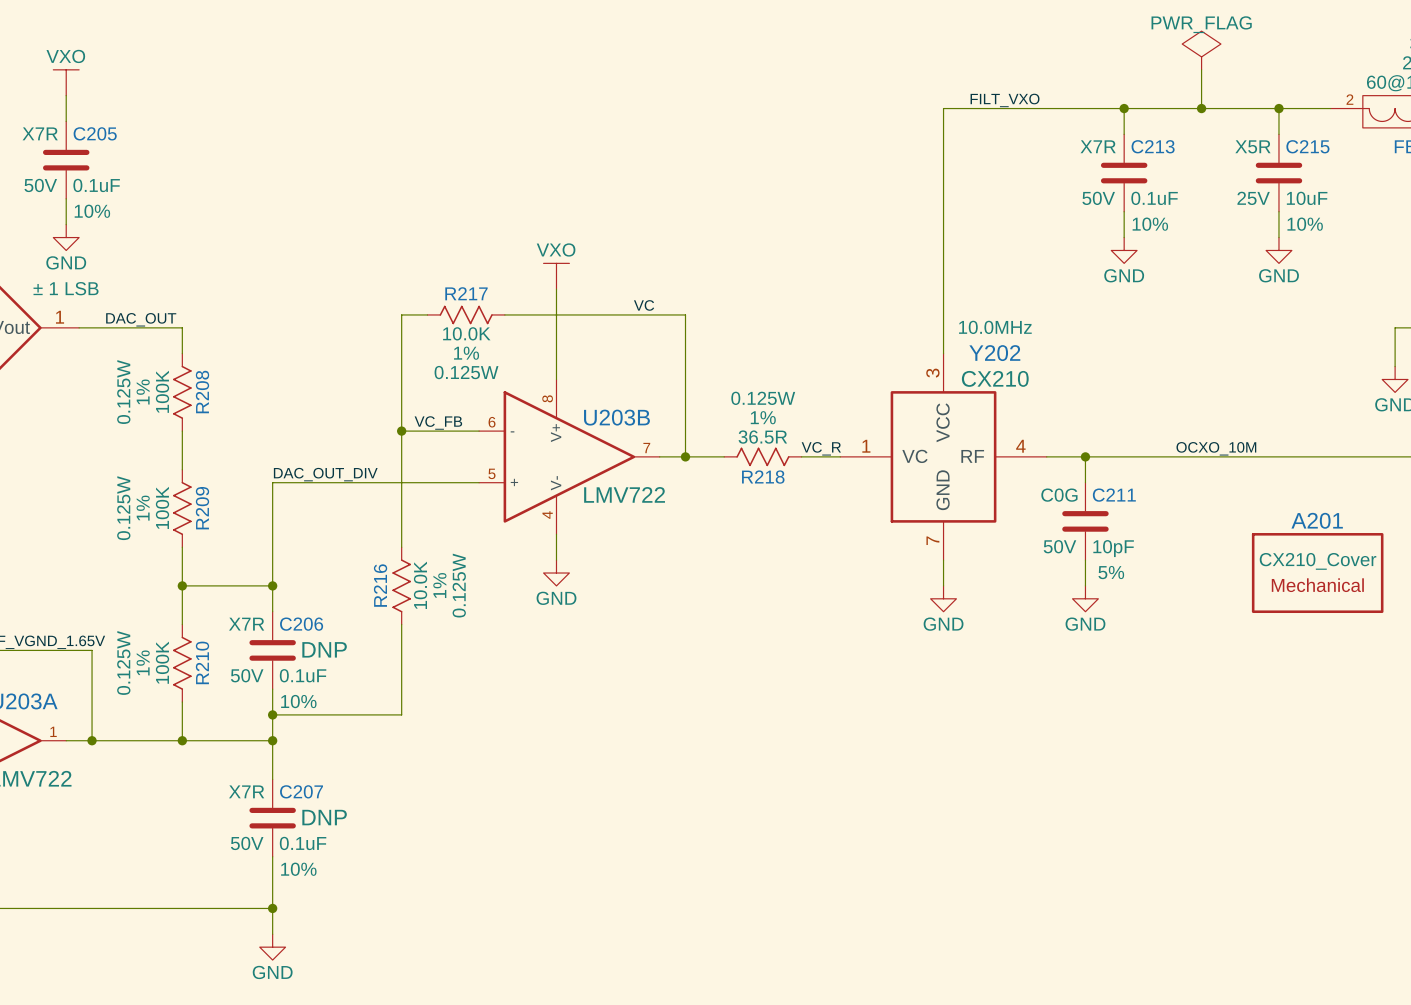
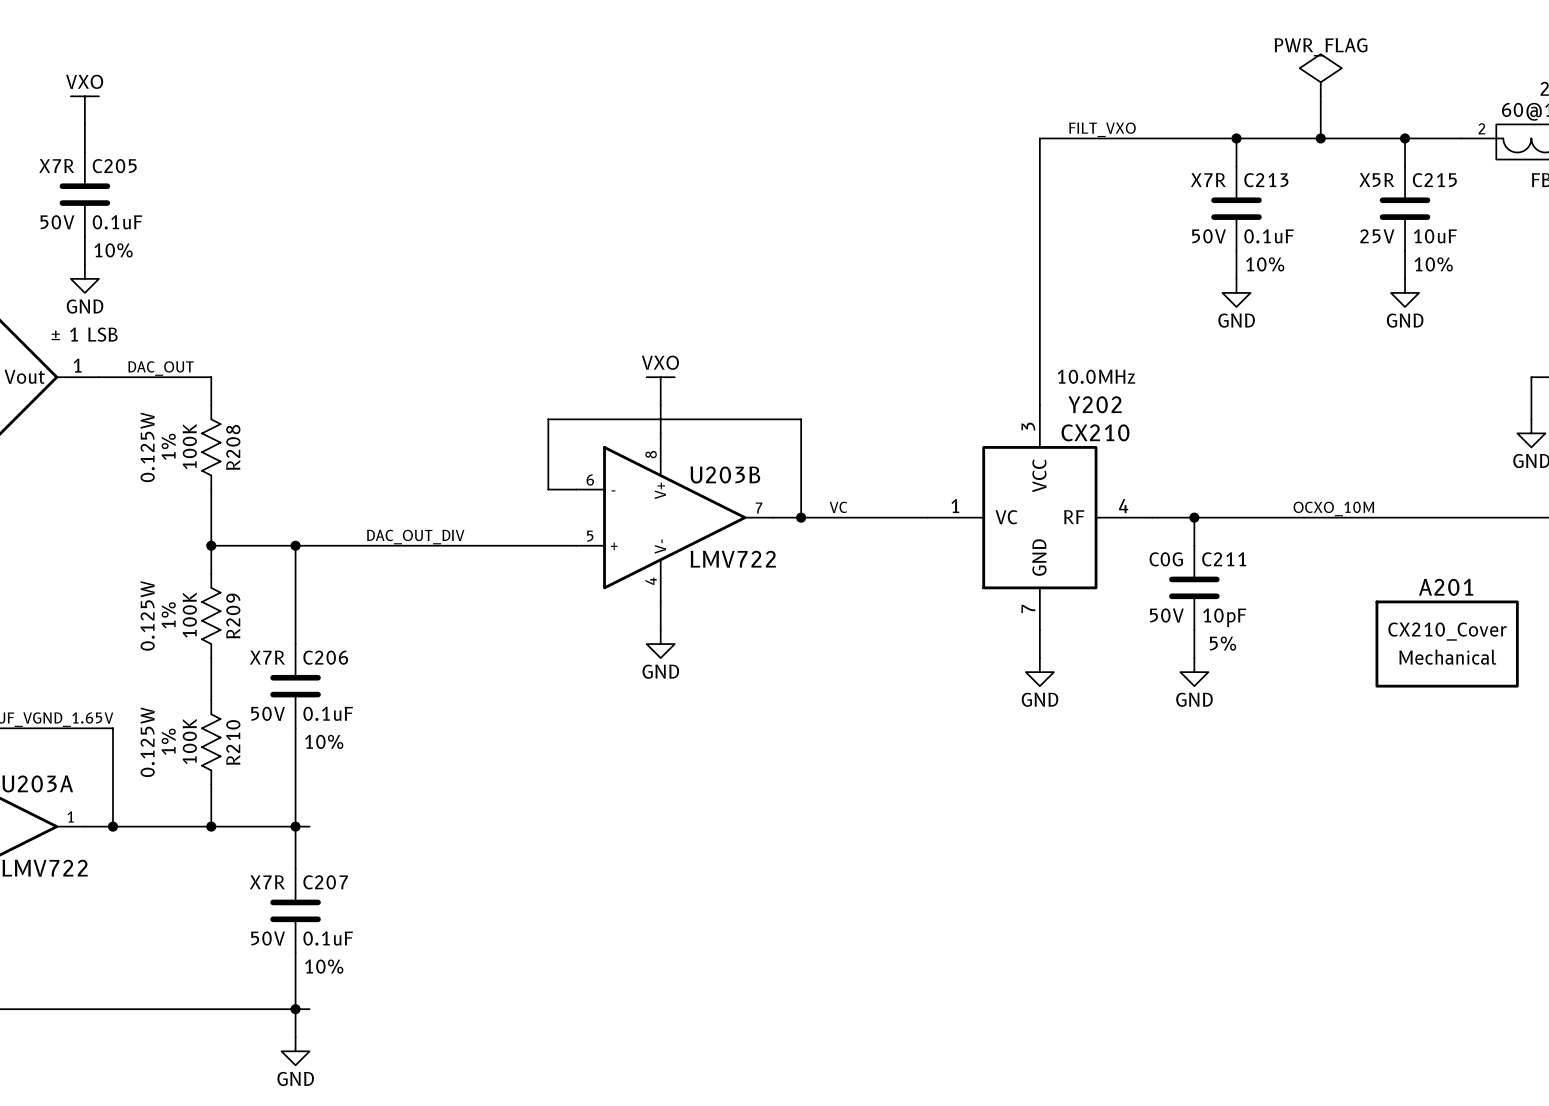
power symbol position: VXO (556, 276) -> VXO (660, 391)
wire: (556, 289) (556, 379) -> none
label position: VC (644, 305) -> VC (838, 507)
wire: (427, 314) (401, 314) (401, 547) -> none
R217: 10.0K (466, 314) -> none
wire: (504, 314) (685, 314) (685, 456) -> none
wire: none -> (660, 405) (660, 433)
label: VC_FB (438, 422) -> none
wire: (401, 431) (479, 431) -> none
junction: (401, 431) -> none
wire: none -> (576, 489) (548, 489) (548, 419) (801, 419) (801, 517) (885, 517)
label: VC_R (821, 448) -> none
U203B position: (569, 456) -> (674, 517)
junction position: (685, 456) -> (801, 517)
R218: 36.5R (762, 456) -> none
wire: none -> (211, 531) (211, 573)
label position: DAC_OUT_DIV (325, 474) -> DAC_OUT_DIV (415, 537)
junction: none -> (211, 545)
junction: none -> (295, 545)
wire: (272, 482) (272, 611) -> (309, 545) (211, 545)
R209 position: (182, 508) -> (211, 615)
wire: (556, 534) (556, 560) -> (660, 601) (660, 630)
wire: (182, 547) (182, 585) (272, 585) -> none
power symbol position: GND (556, 573) -> GND (660, 644)
junction: (182, 585) -> none
junction: (272, 585) -> none
R216: 10.0K (401, 585) -> none
wire: (401, 624) (401, 714) (272, 714) -> none
C206 text: DNP (324, 649) -> none
wire: none -> (295, 728) (295, 868)
C206 position: (272, 650) -> (295, 686)
wire: (272, 689) (272, 779) -> (295, 545) (295, 644)
junction: (272, 714) -> none
junction position: (272, 740) -> (295, 826)
C207 text: DNP (324, 817) -> none
C207 position: (272, 818) -> (295, 910)
wire: (272, 856) (272, 934) -> (295, 953) (295, 1037)
junction position: (272, 908) -> (295, 1009)
power symbol position: GND (272, 947) -> GND (295, 1051)

